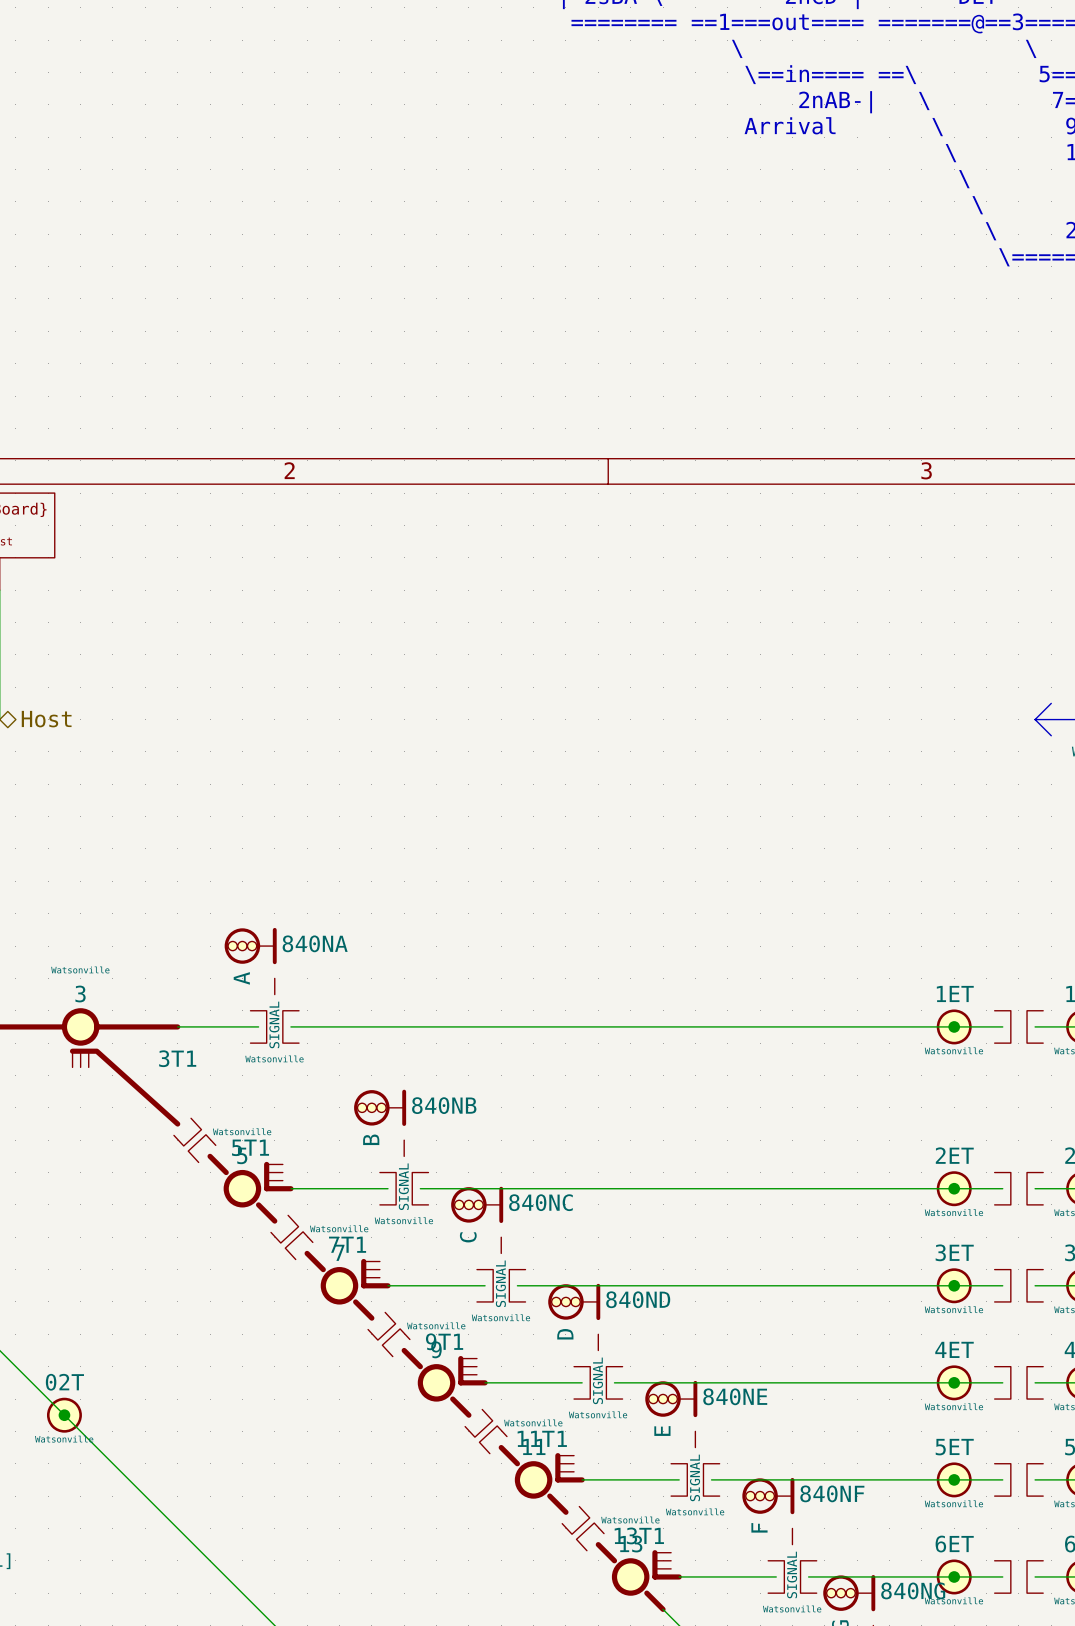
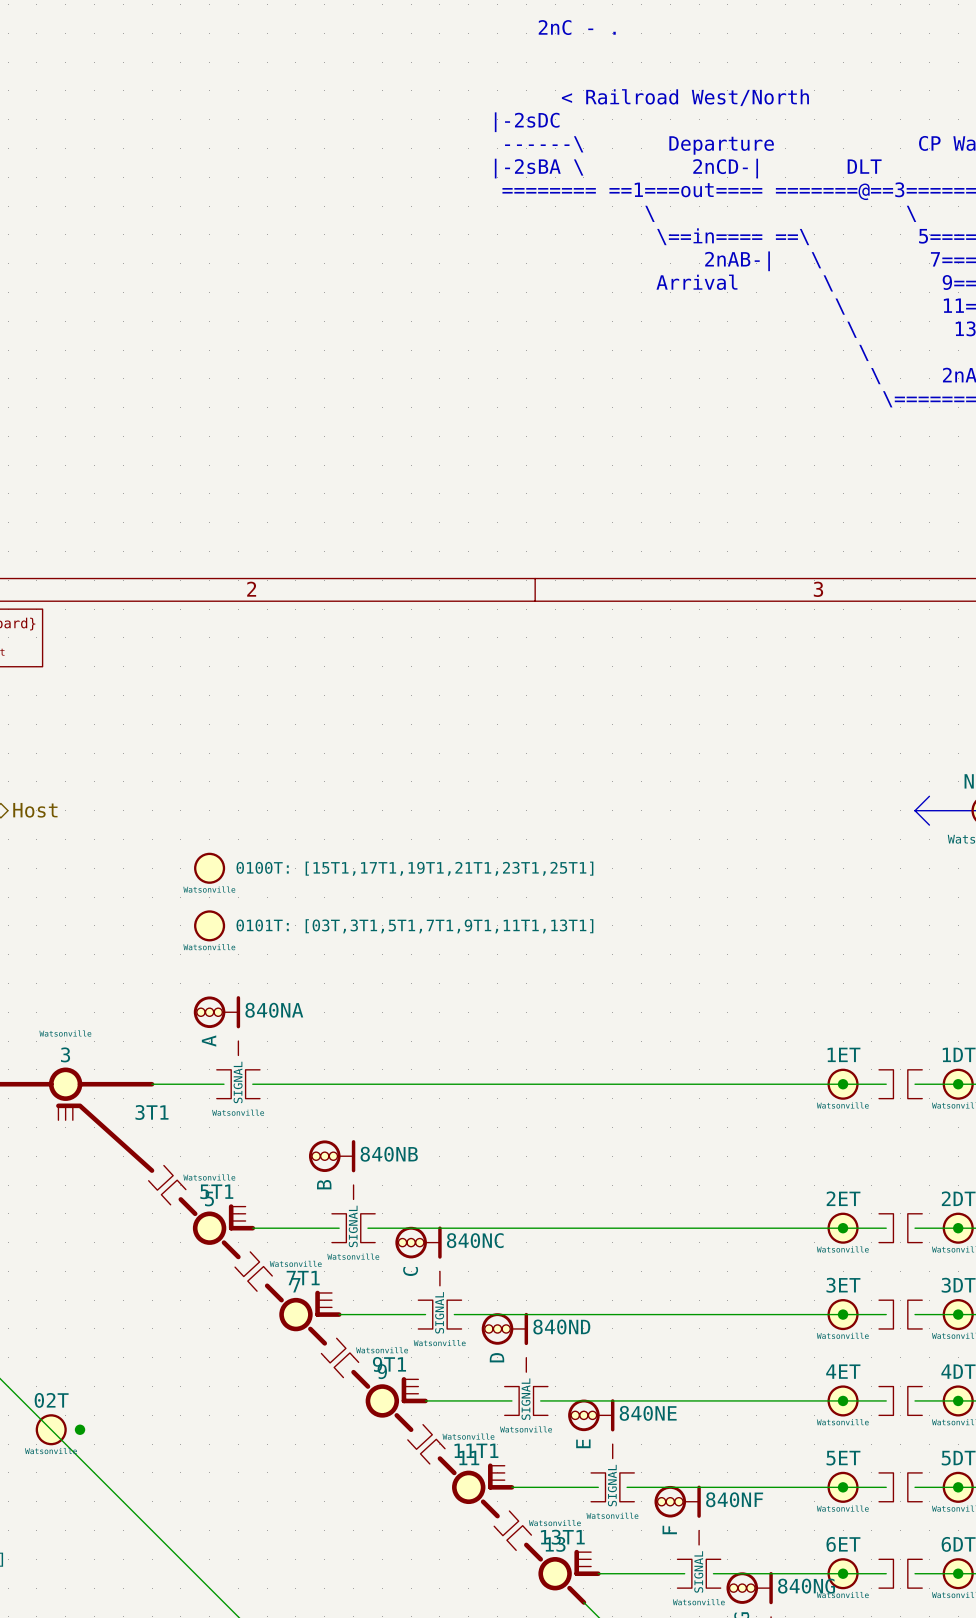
part: none -> (209, 868)
part: none -> (209, 925)
junction position: (64, 1415) -> (80, 1429)

